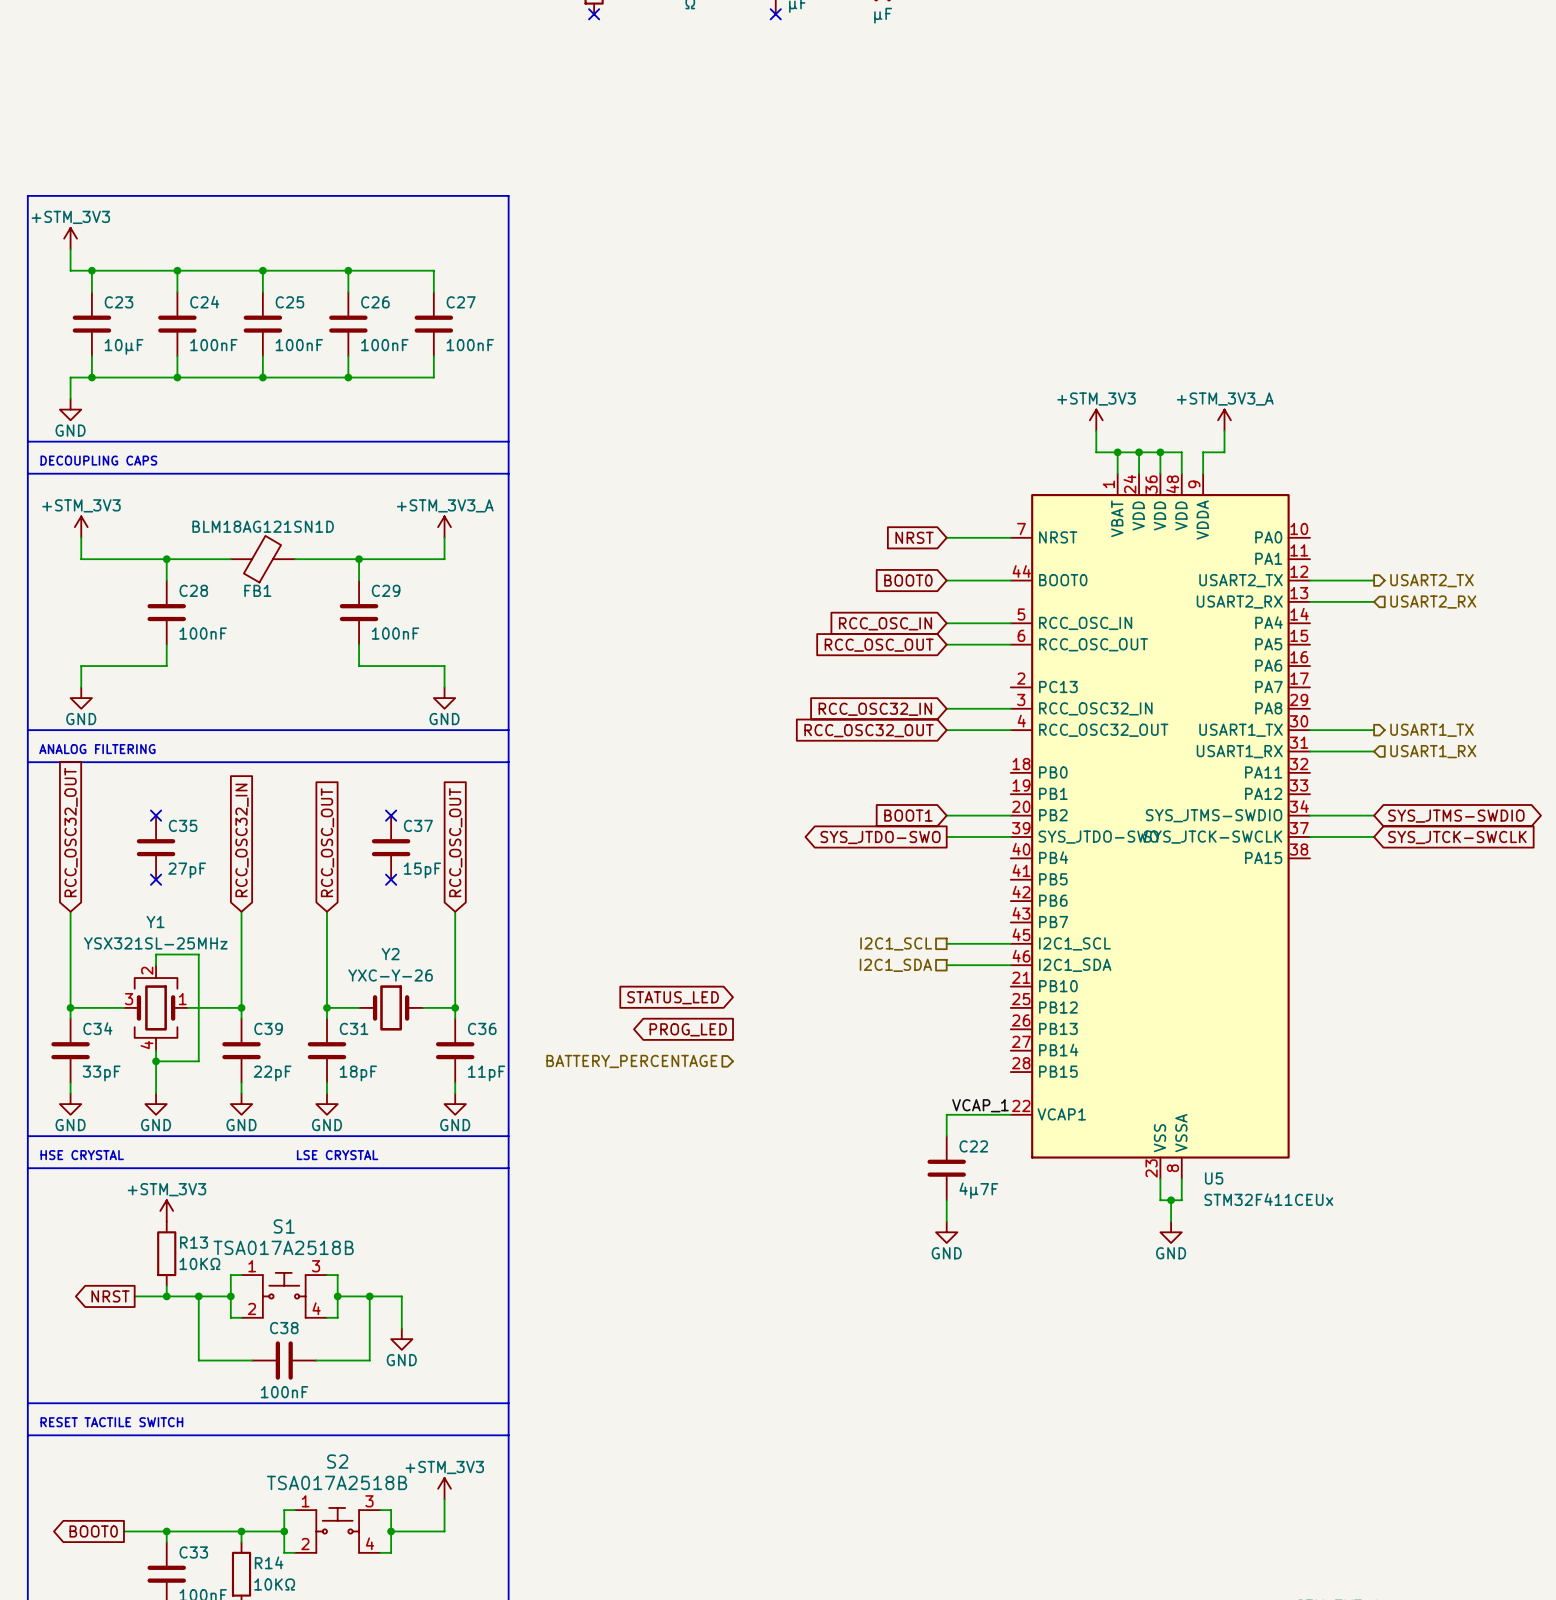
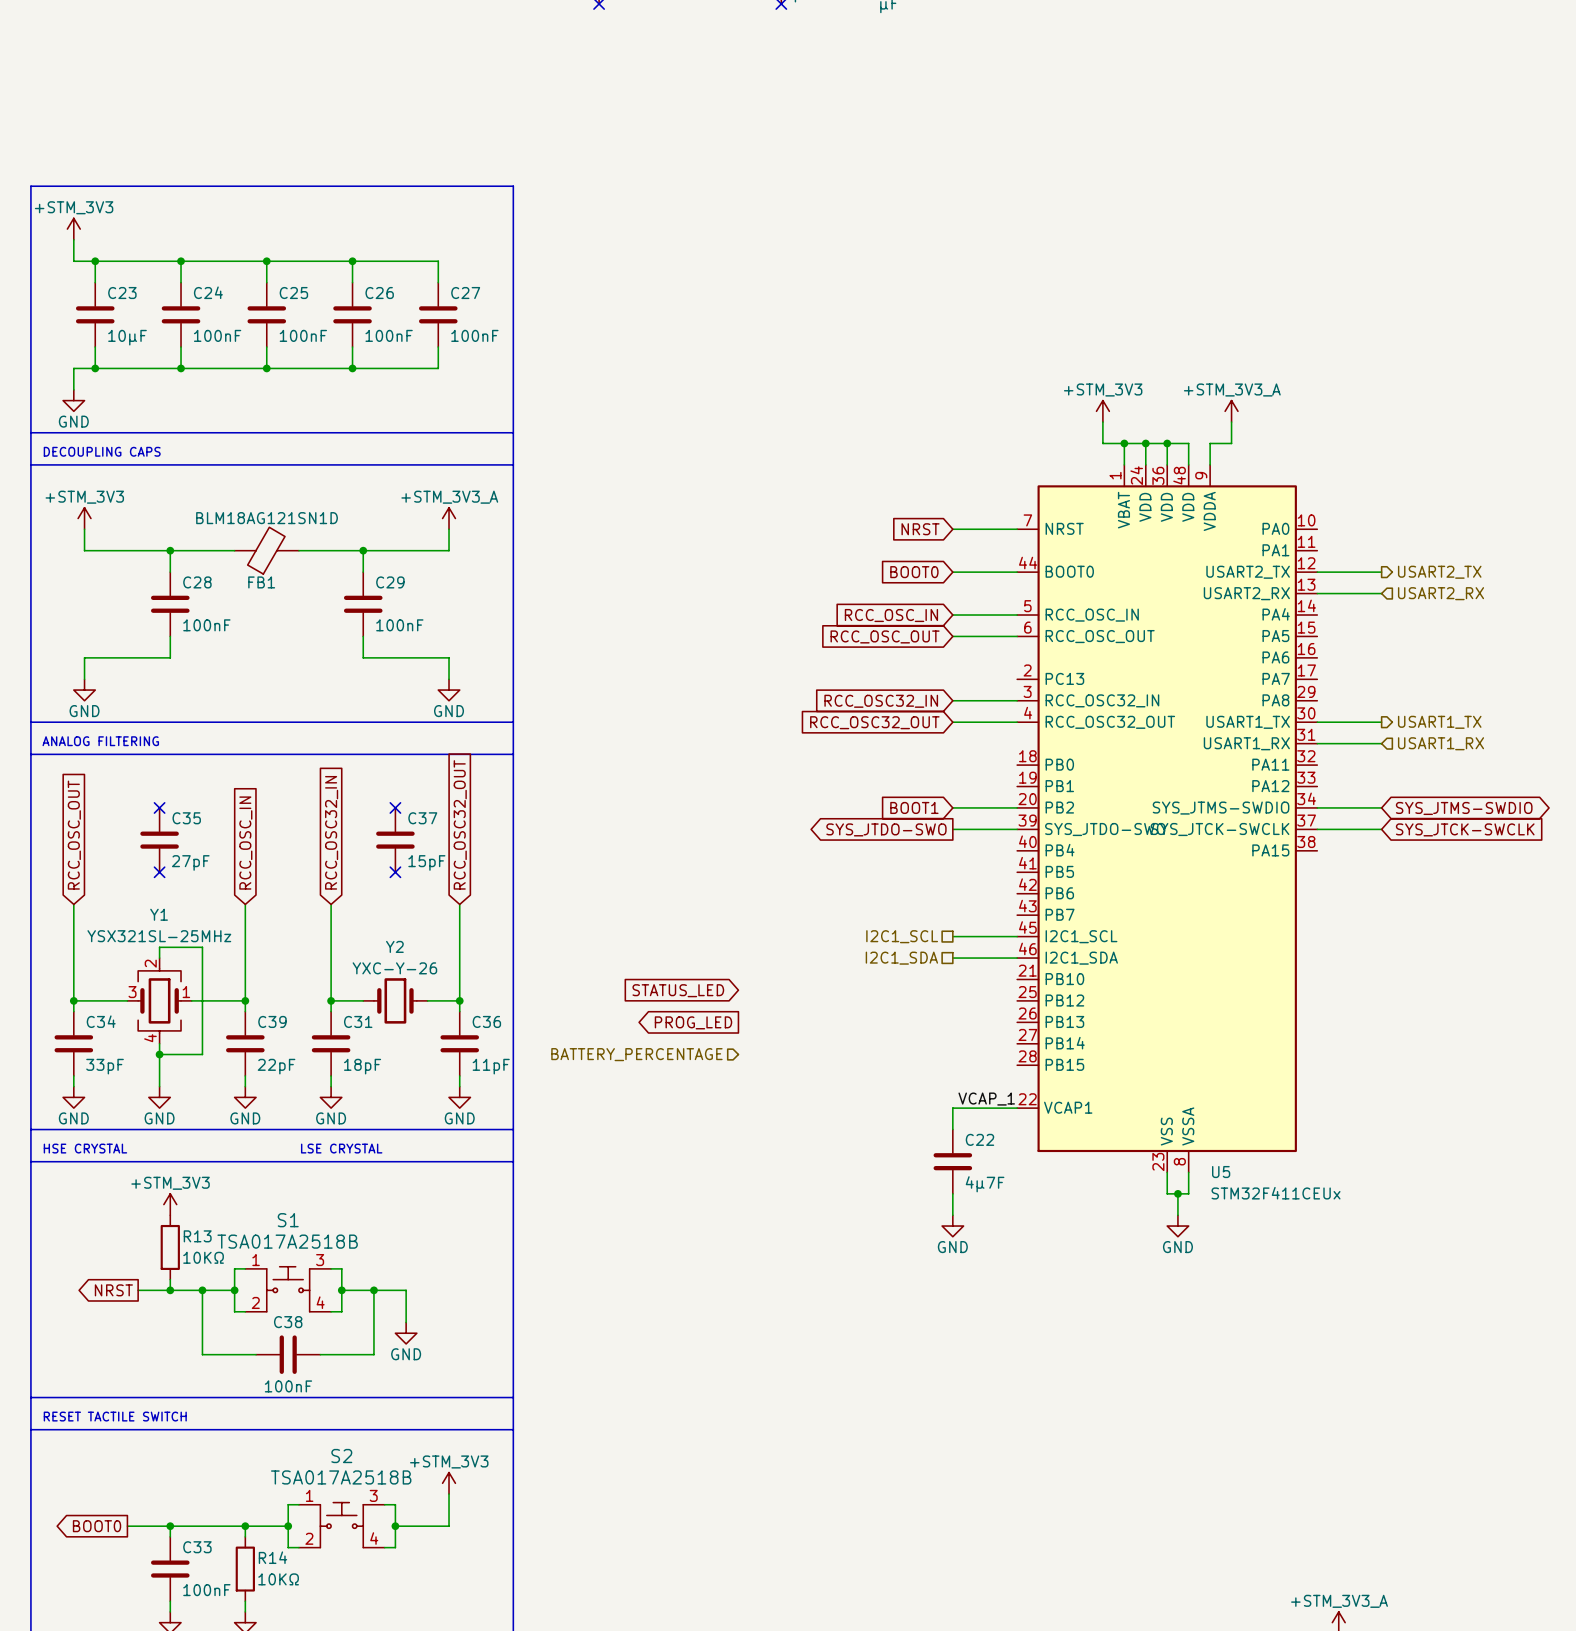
global label: RCC_OSC32_OUT (71, 832) -> RCC_OSC_OUT (74, 835)
global label: RCC_OSC32_IN (242, 840) -> RCC_OSC_IN (245, 843)
global label: RCC_OSC_OUT (327, 842) -> RCC_OSC32_IN (331, 832)
global label: RCC_OSC_OUT (455, 842) -> RCC_OSC32_OUT (460, 824)

